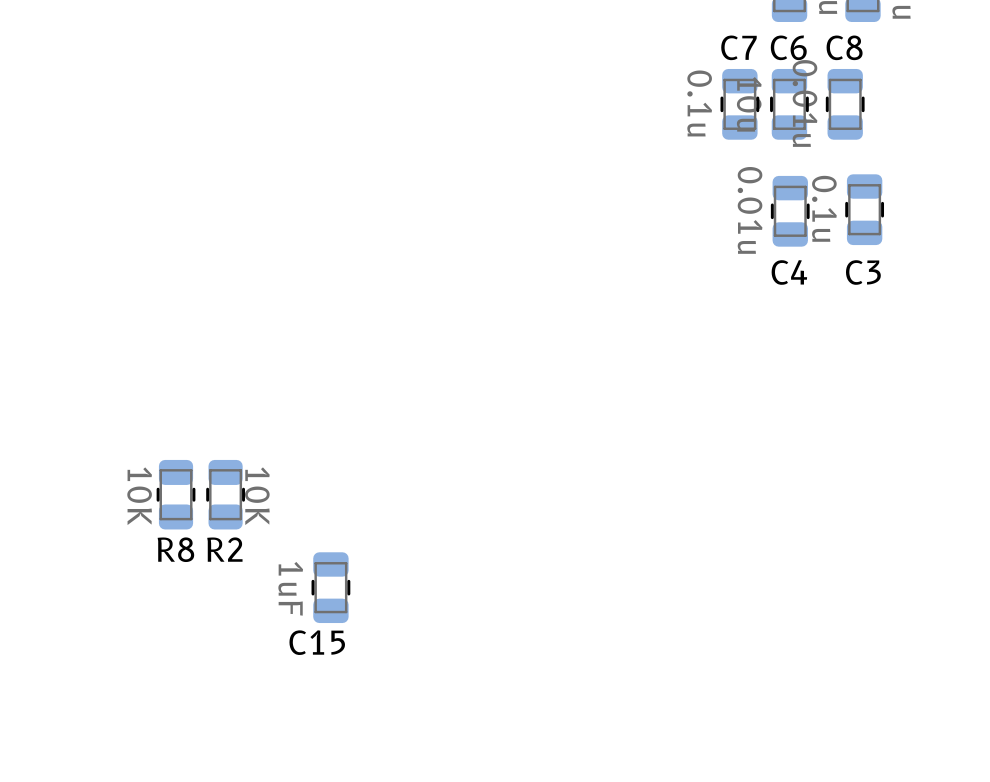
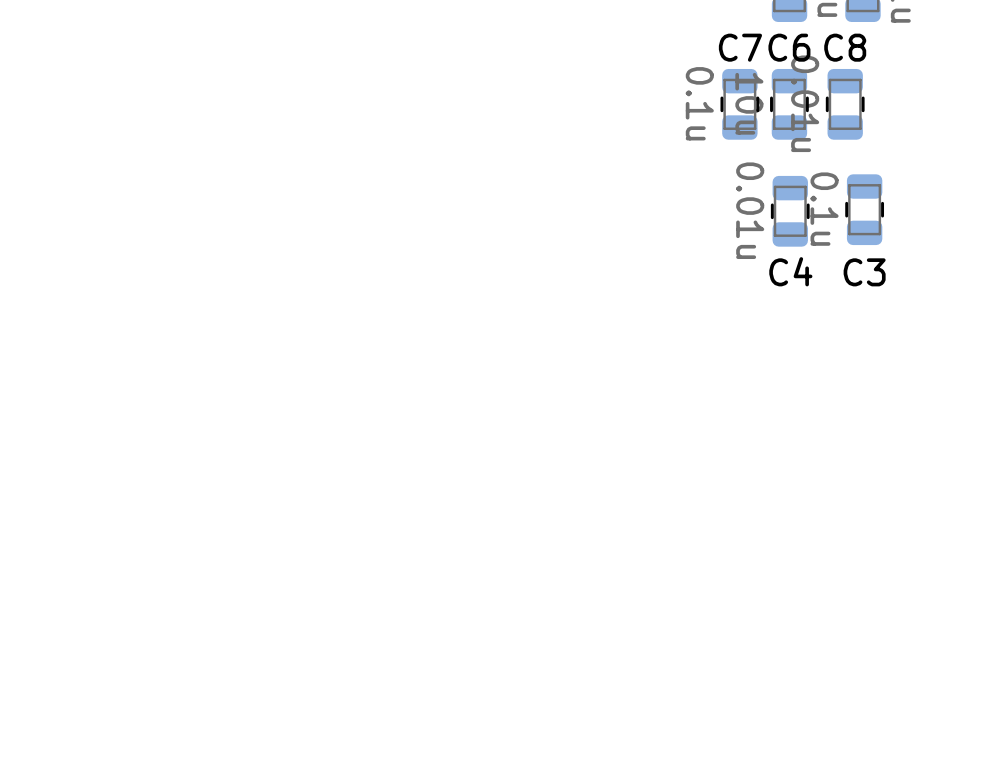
R8: 10K (176, 494) -> none
R2: 10K (225, 494) -> none
C15: 1uF (330, 587) -> none

